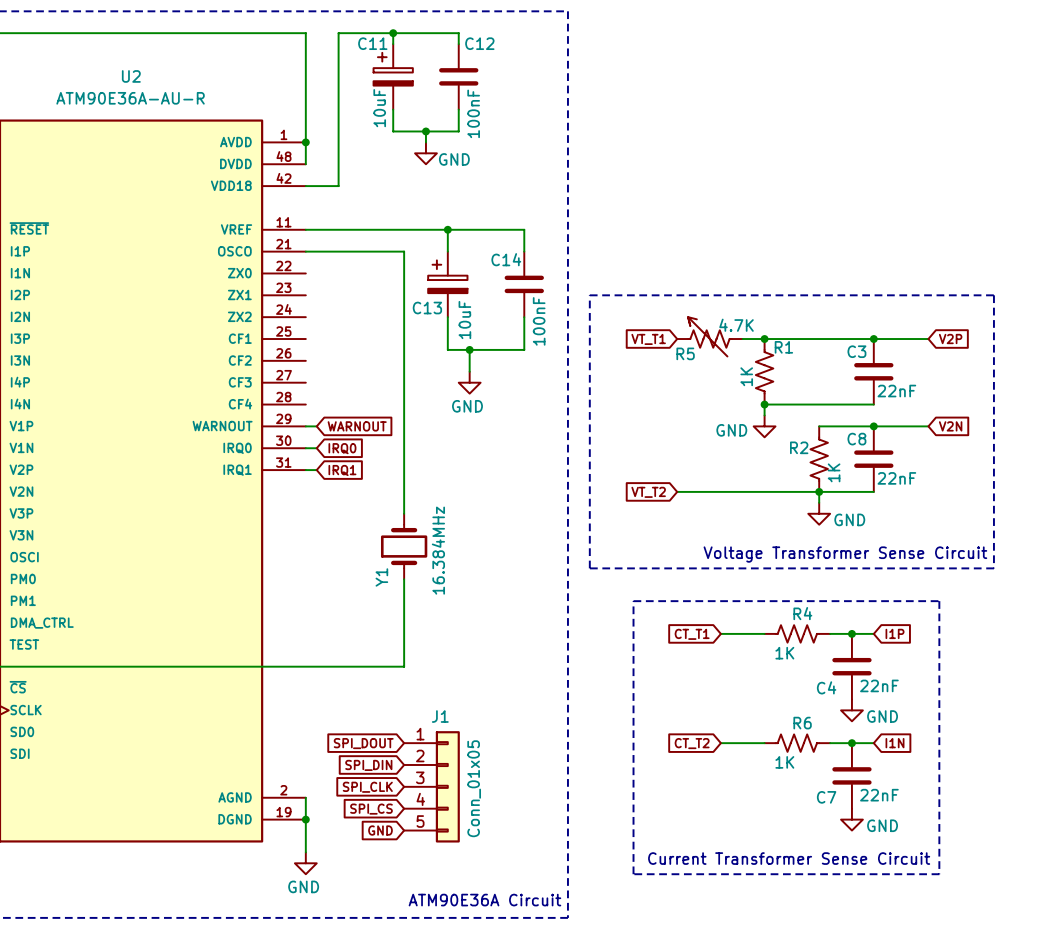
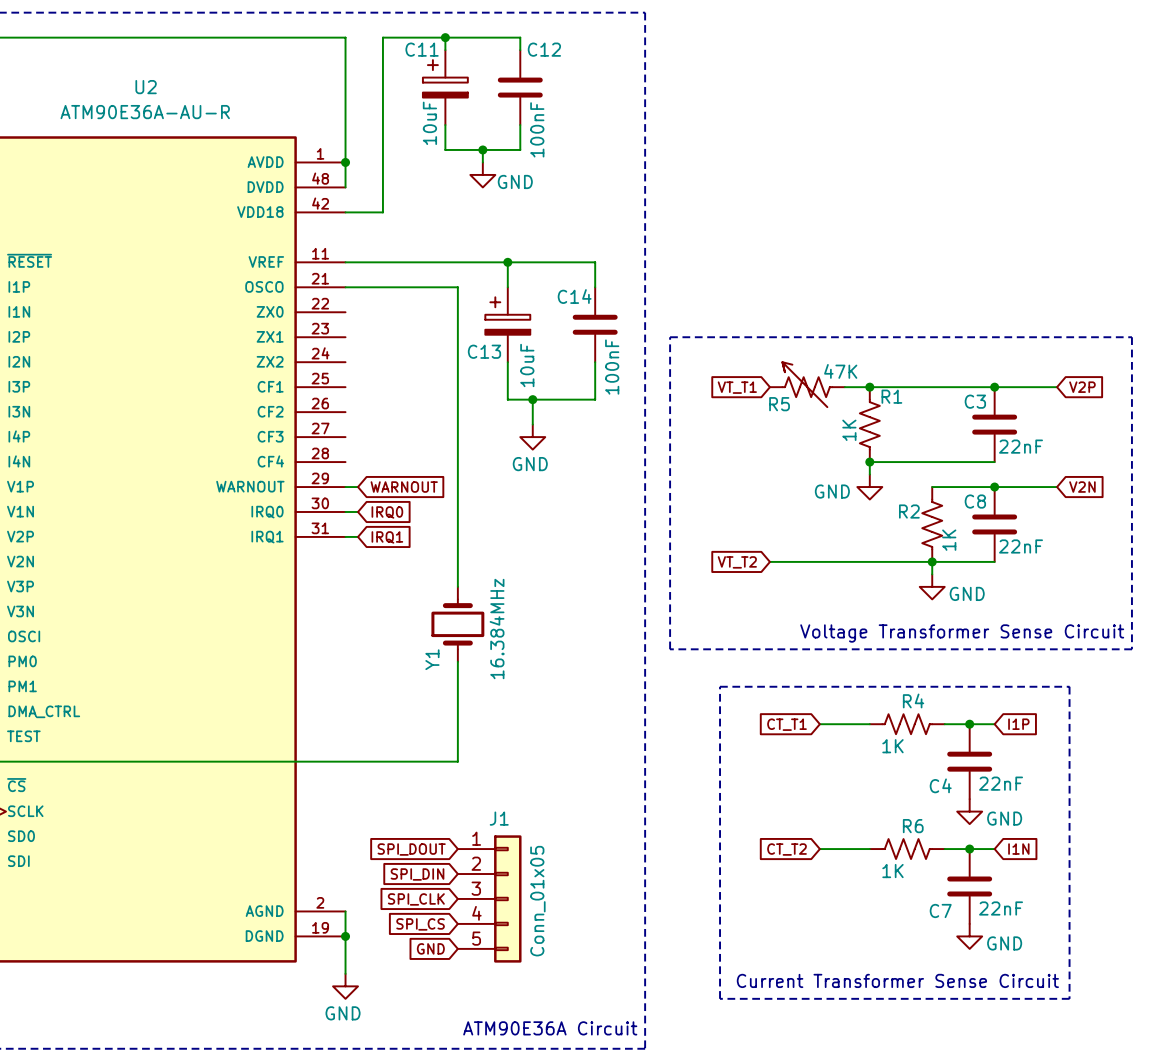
R5 value: 4.7K (736, 325) -> 47K (840, 371)

